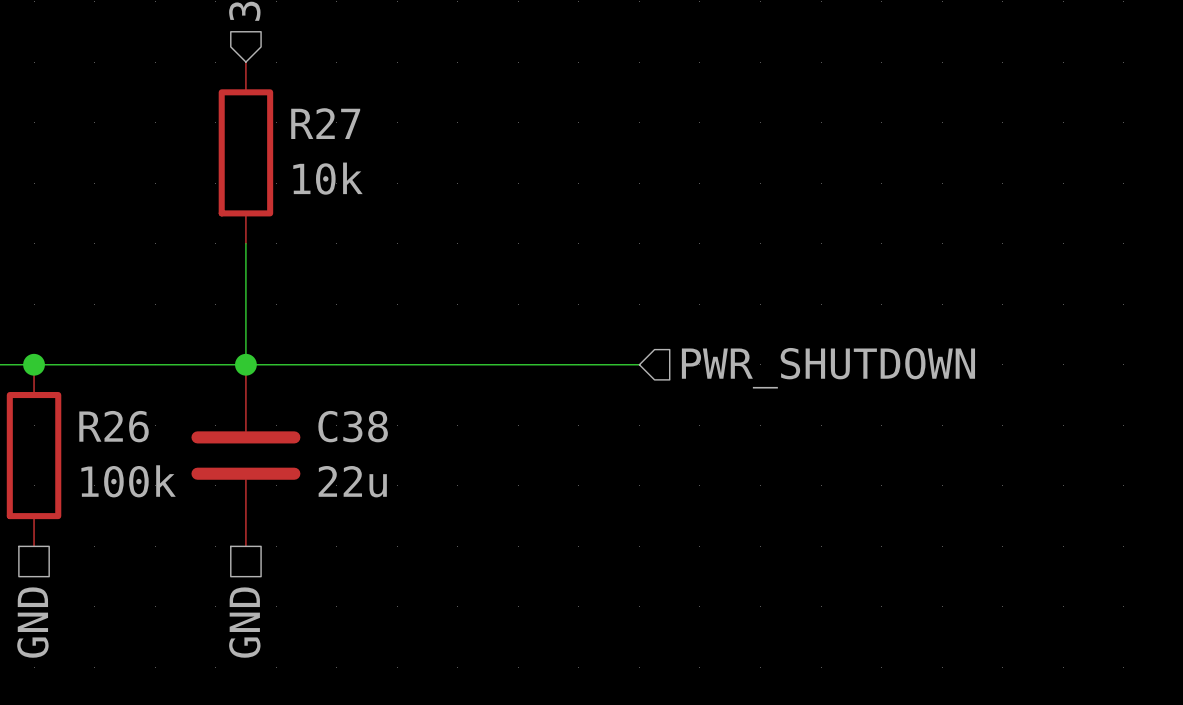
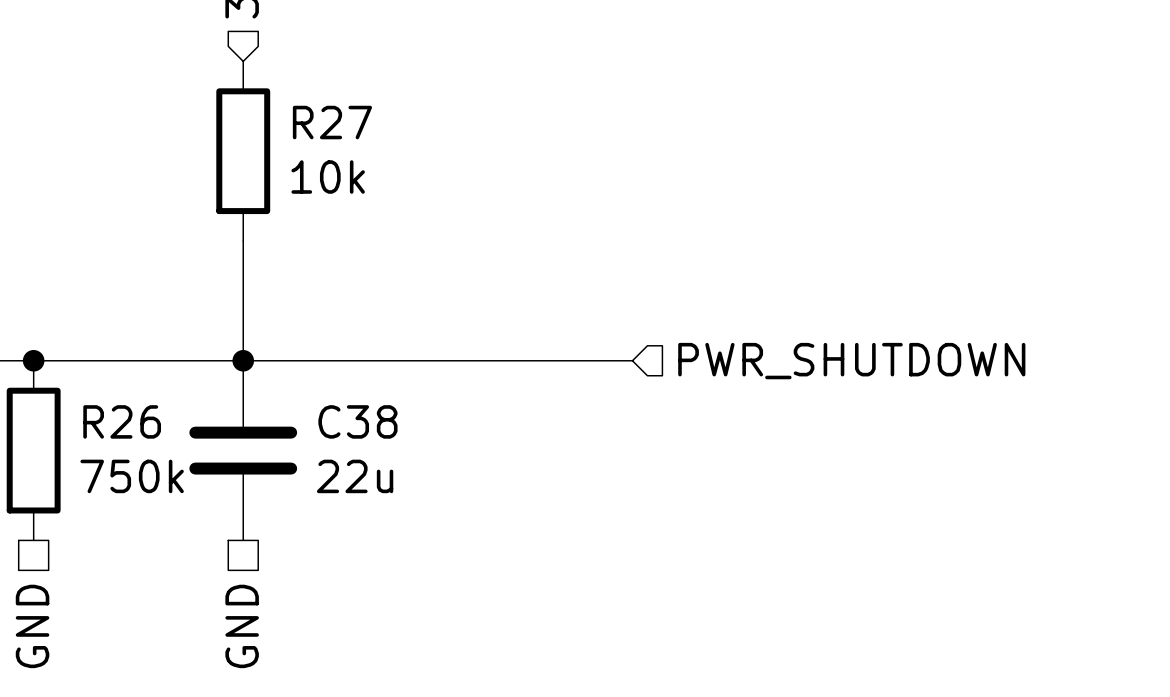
R26 value: 100k (128, 481) -> 750k (132, 476)

